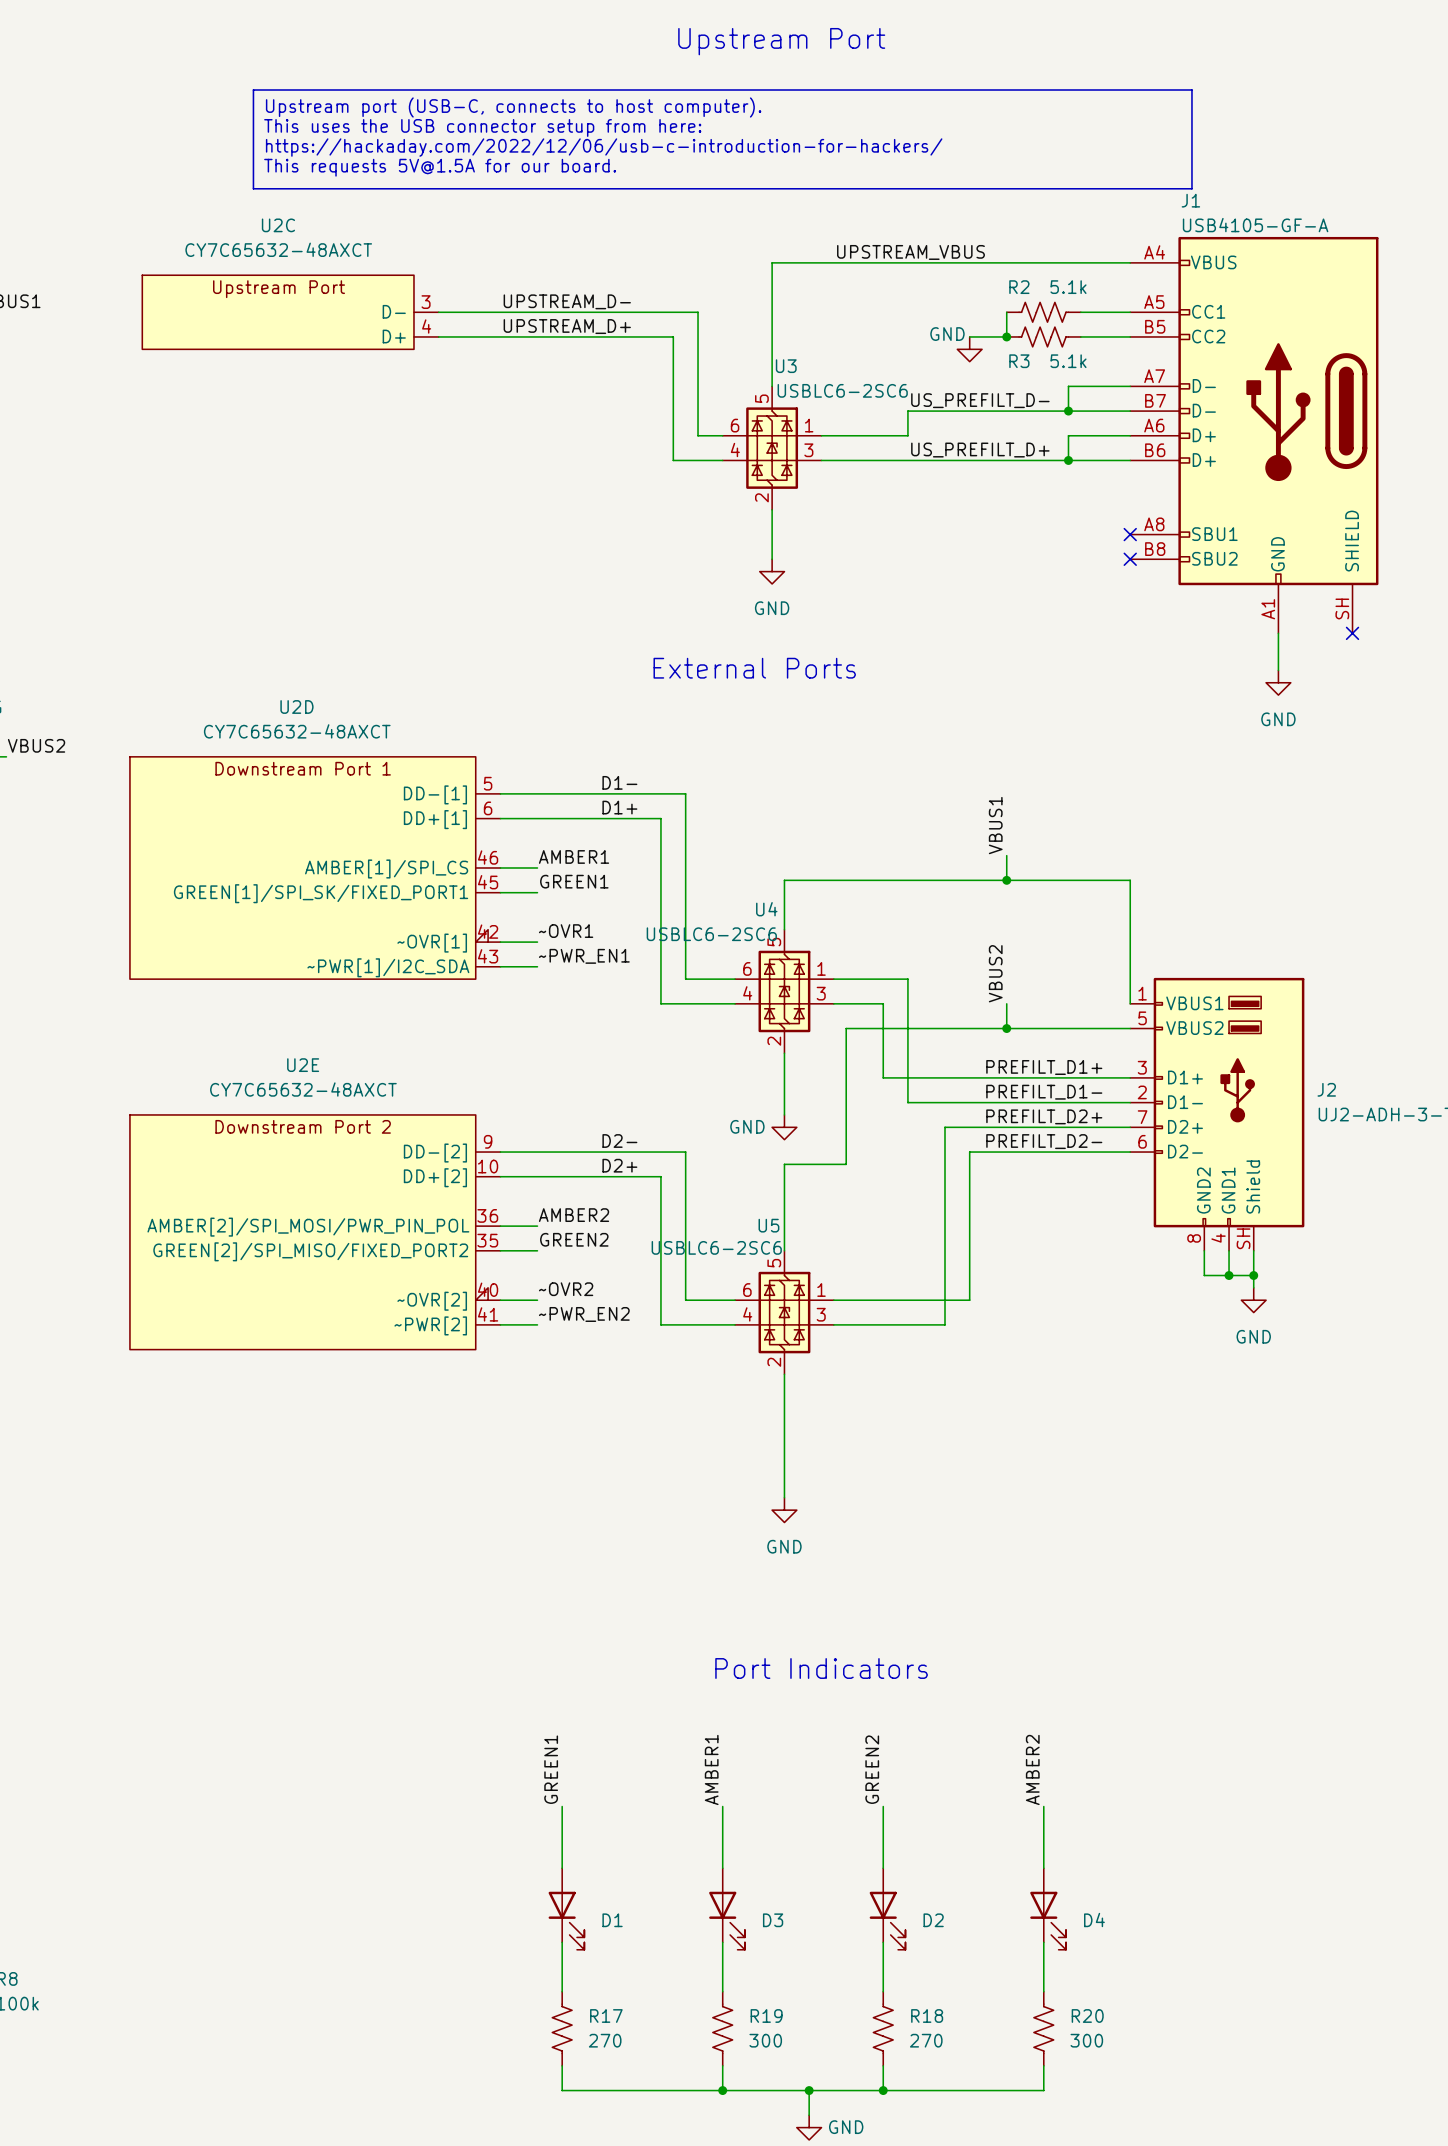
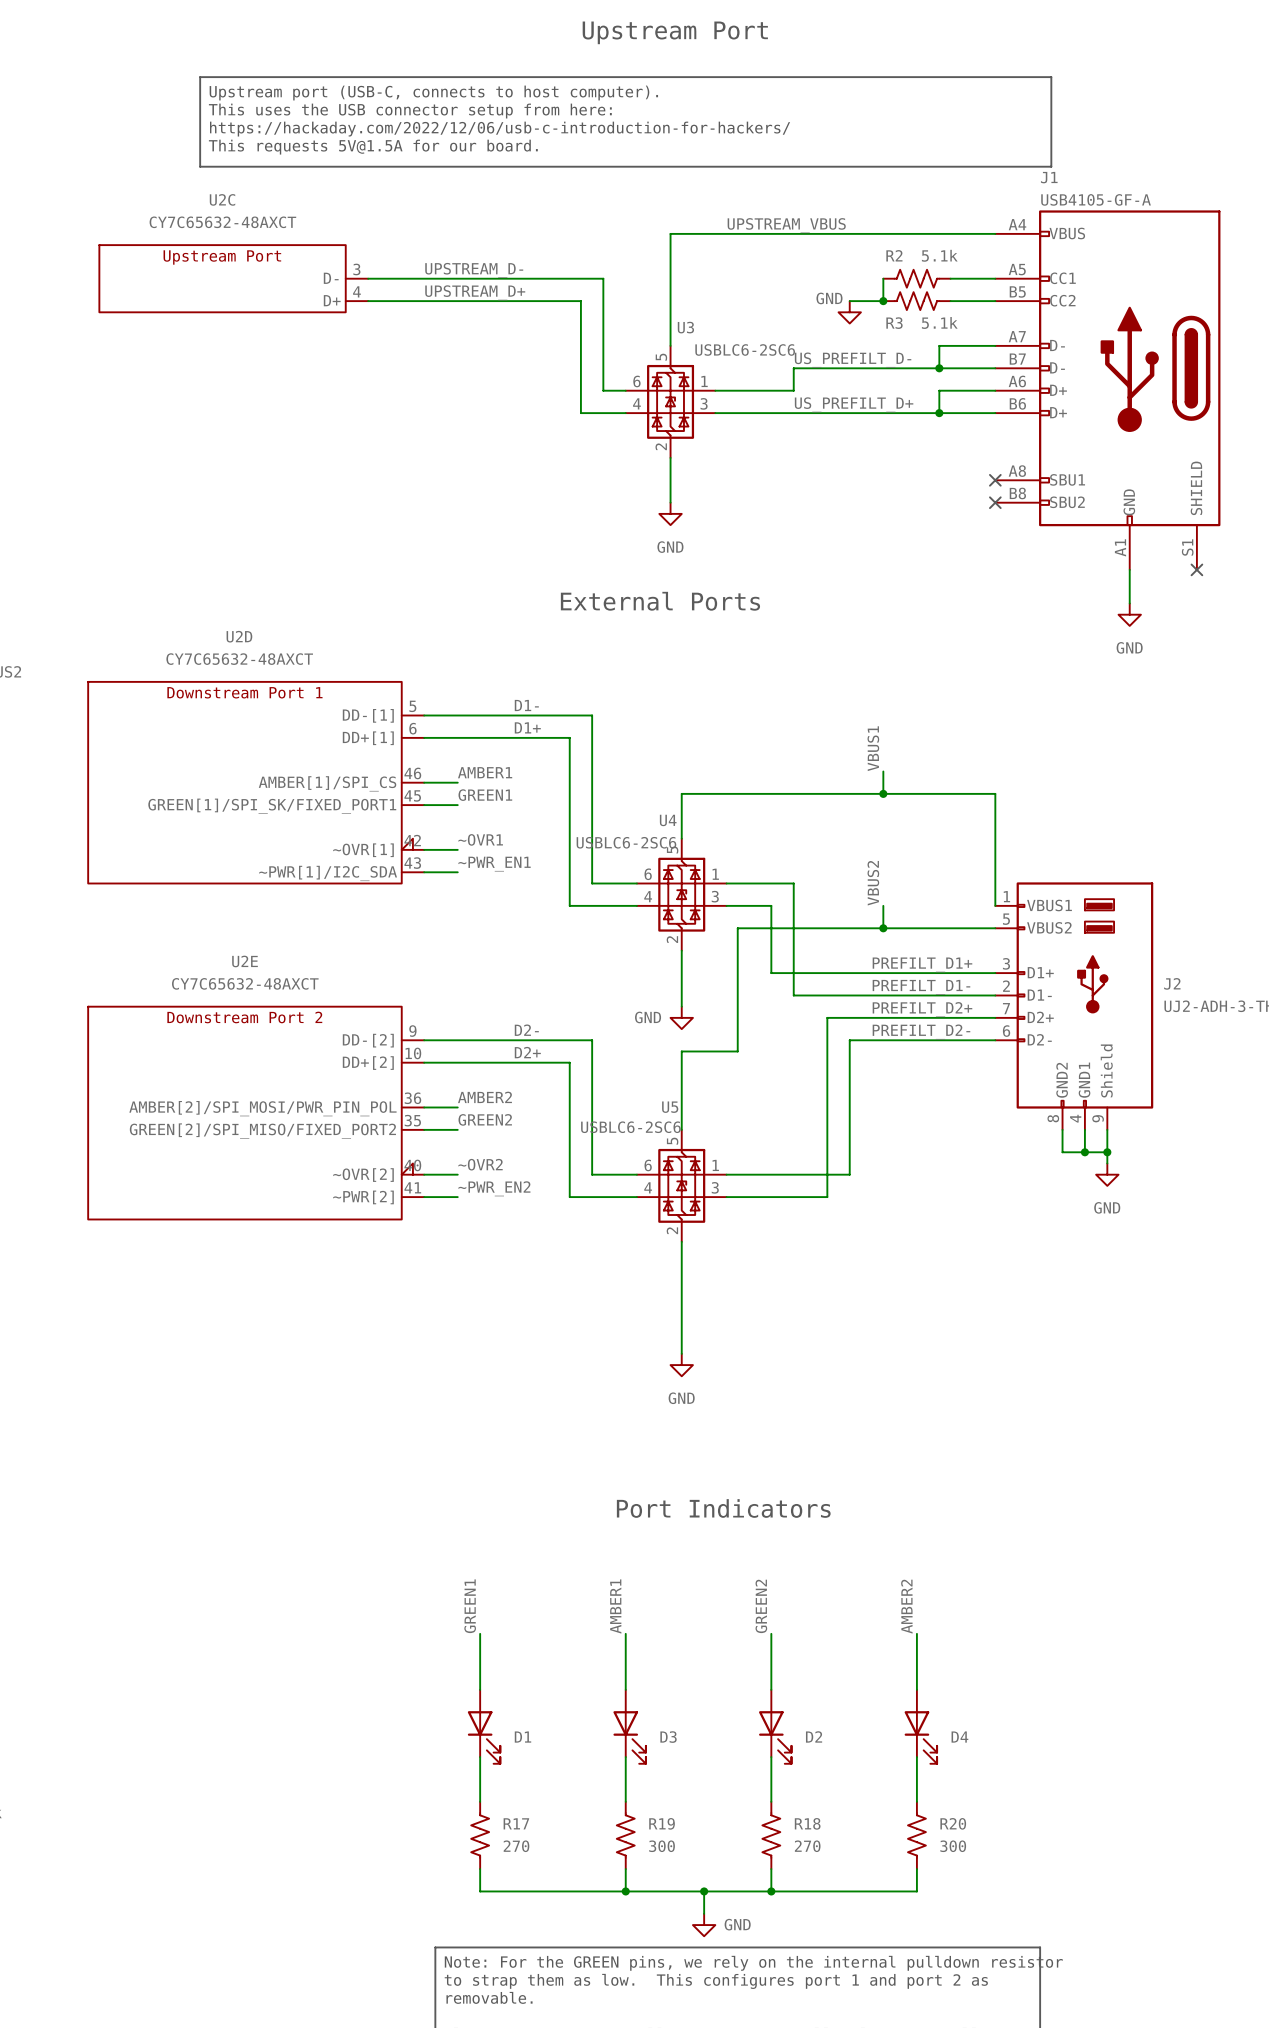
J1 pin number: SH (1342, 608) -> S1 (1187, 547)
J2 pin number: SH (1243, 1238) -> 9 (1098, 1118)

